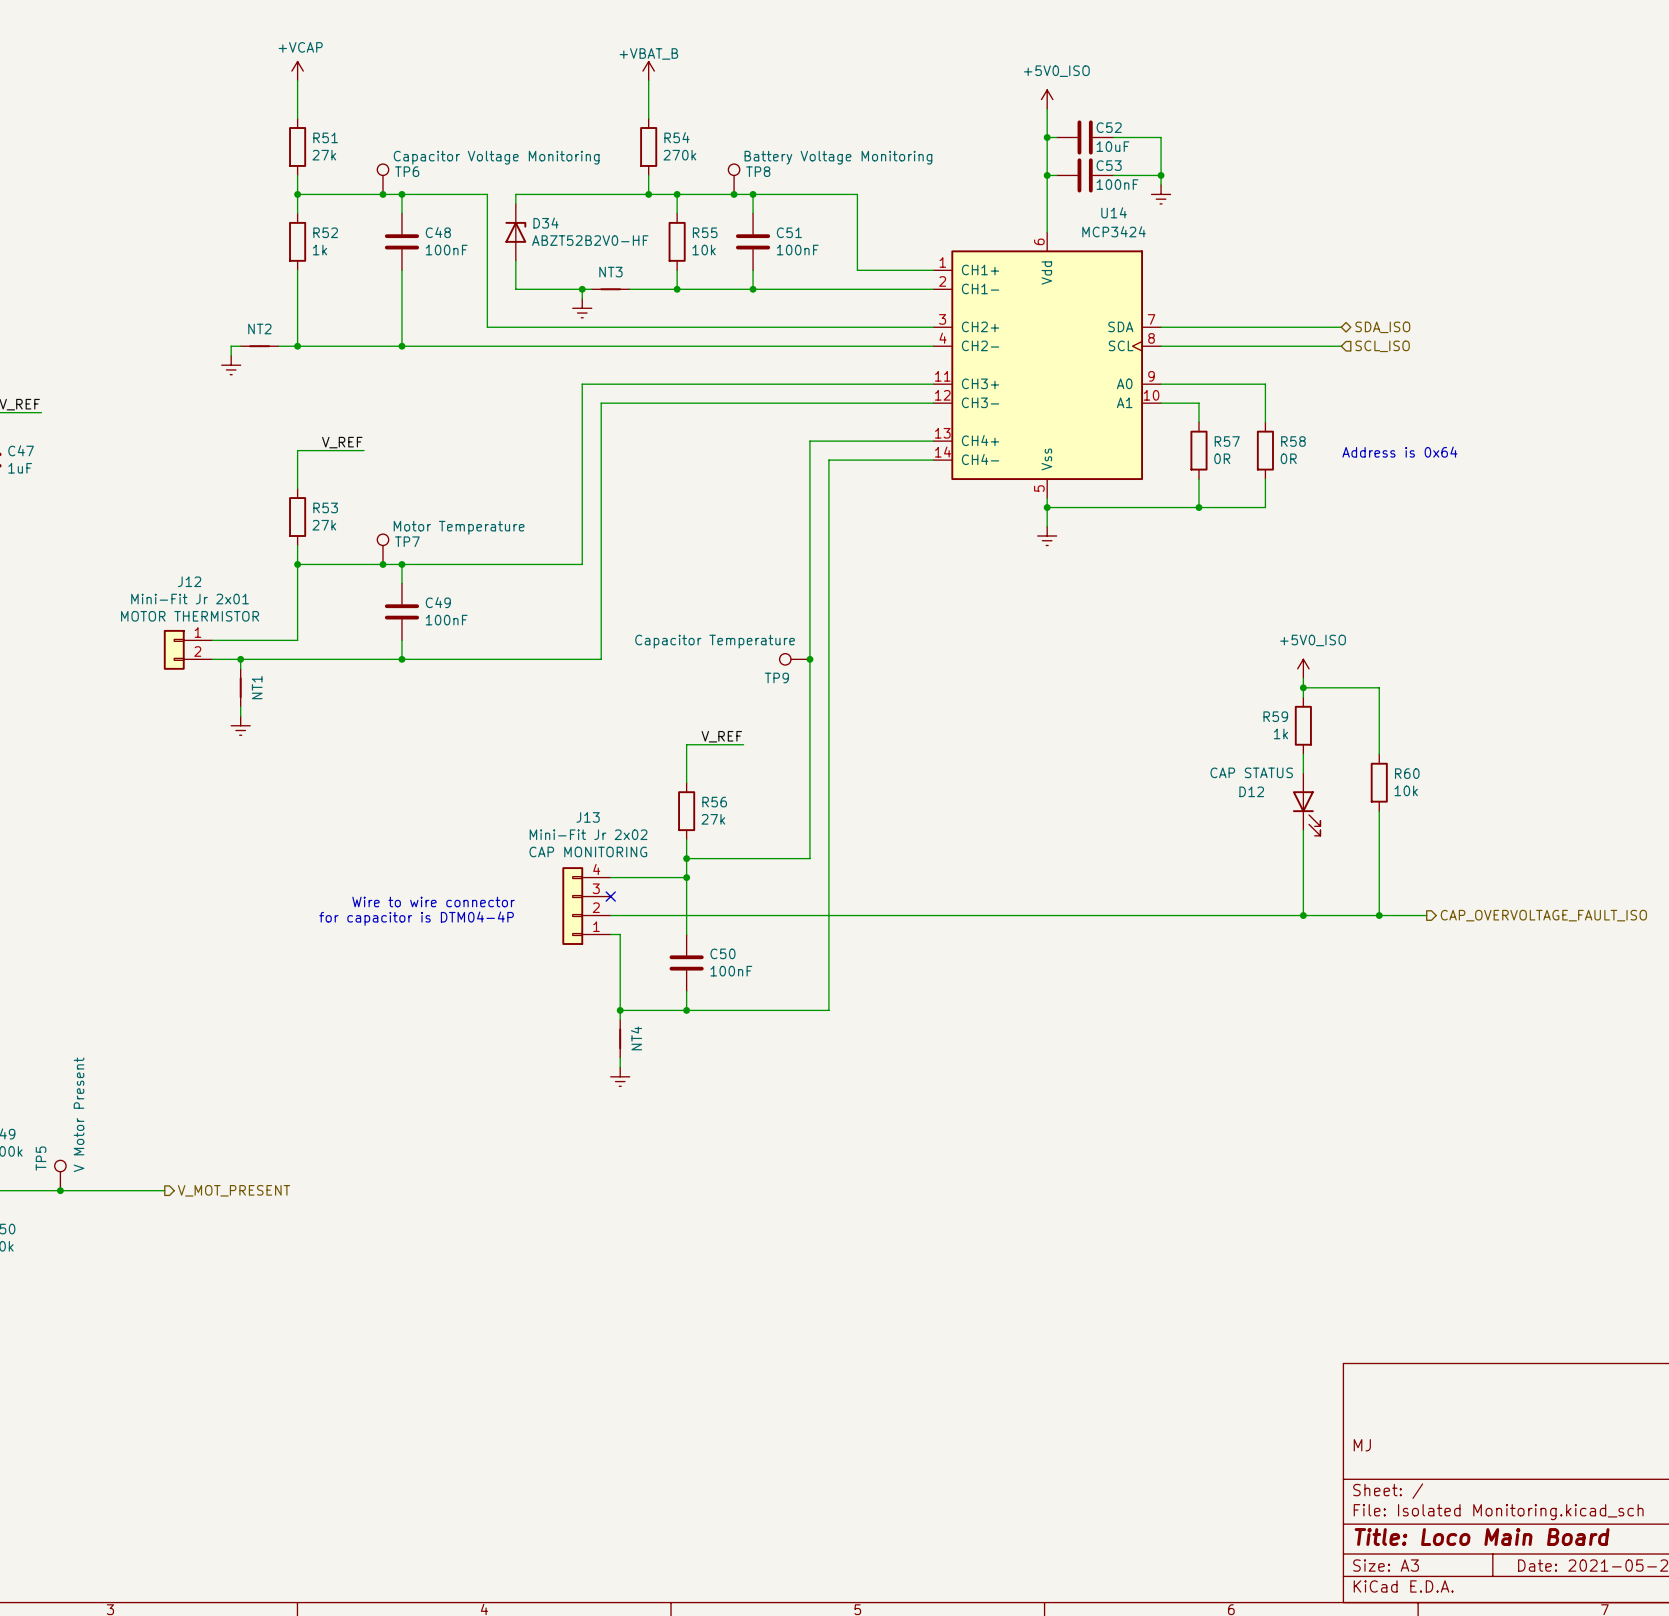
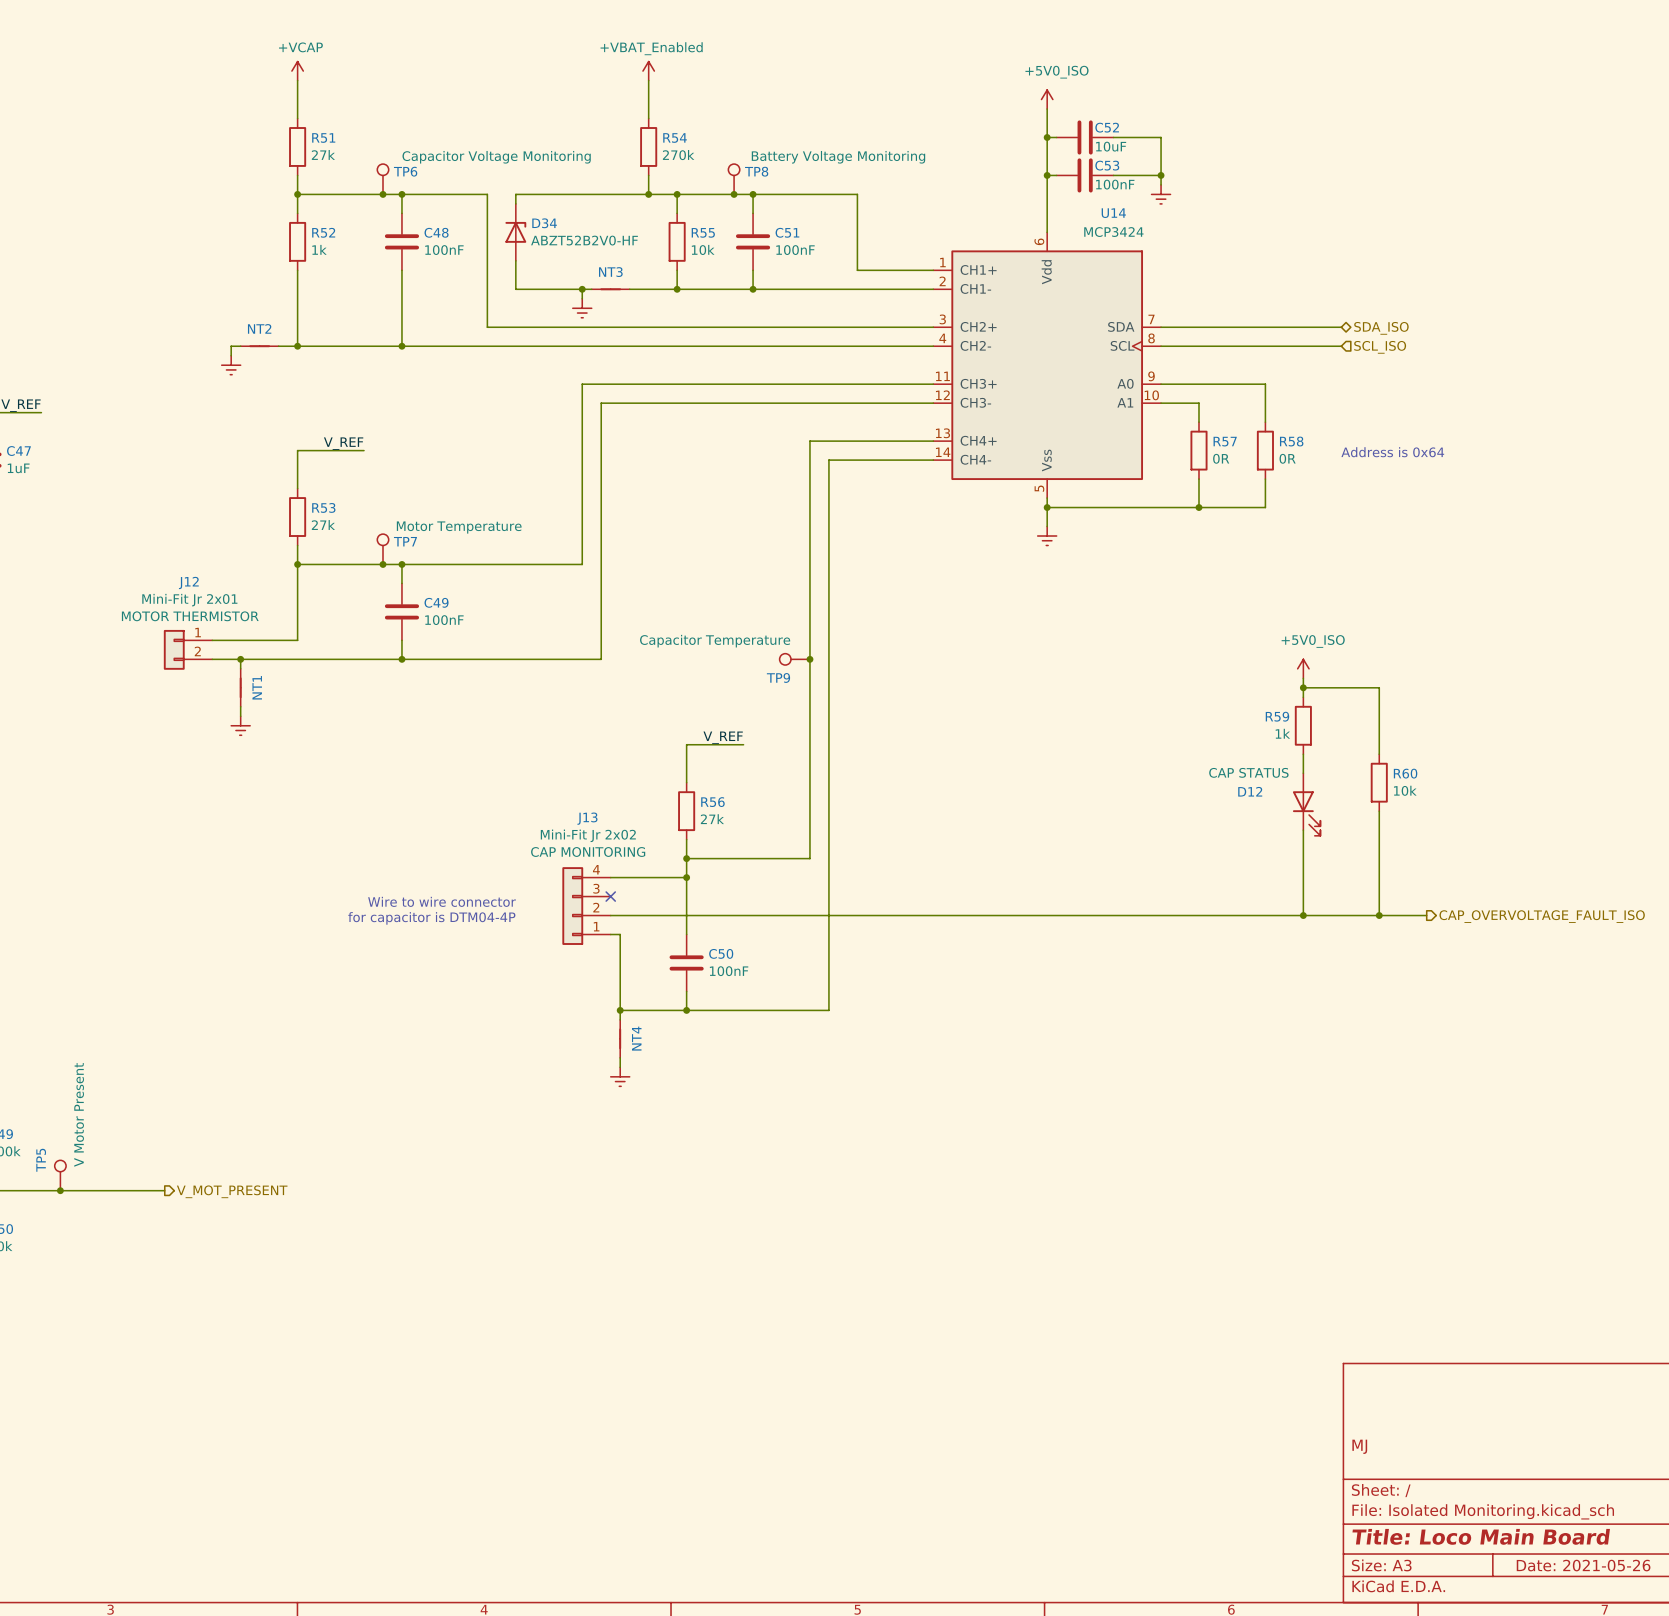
power symbol: +VBAT_B (648, 71) -> +VBAT_Enabled (648, 71)

